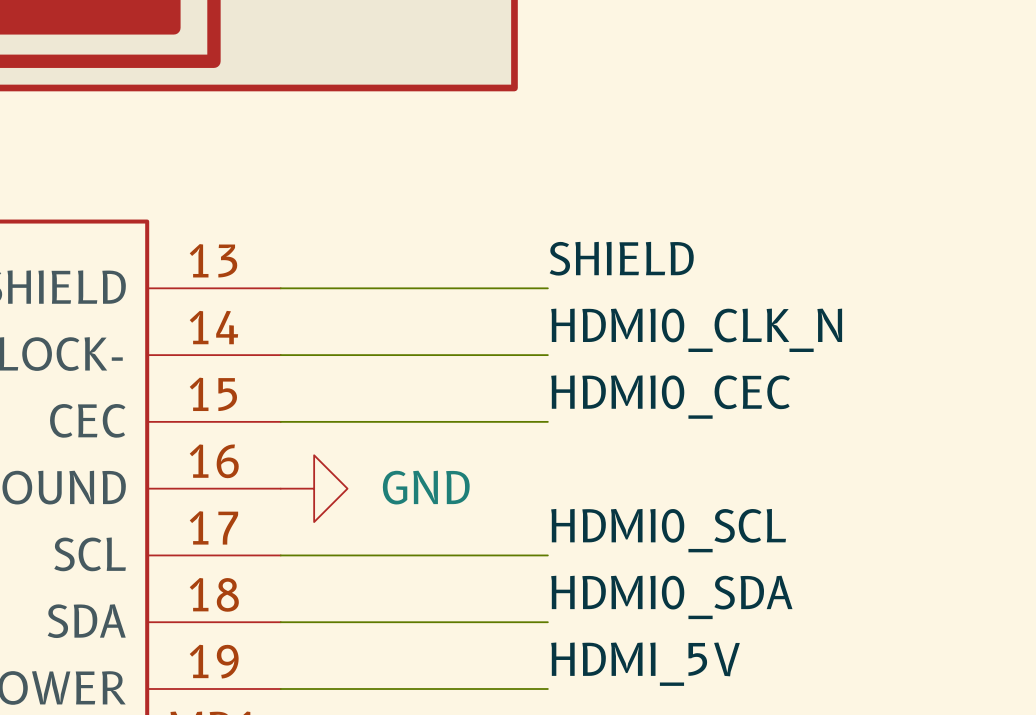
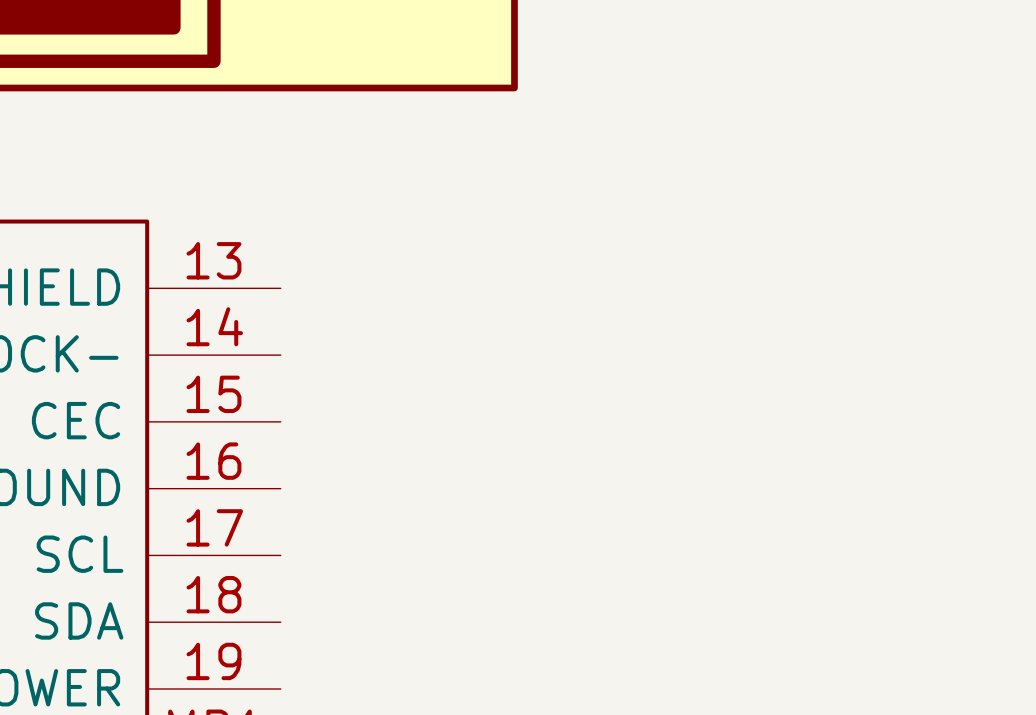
label: SHIELD (621, 258) -> none
wire: (280, 288) (547, 288) -> none
label: HDMI0_CLK_N (696, 330) -> none
wire: (280, 355) (547, 355) -> none
label: HDMI0_CEC (670, 397) -> none
wire: (280, 421) (547, 421) -> none
power symbol: GND (314, 488) -> none
label: HDMI0_SCL (668, 530) -> none
wire: (280, 555) (547, 555) -> none
label: HDMI0_SDA (671, 597) -> none
wire: (280, 622) (547, 622) -> none
label: HDMI_5V (645, 664) -> none
wire: (280, 688) (547, 688) -> none

